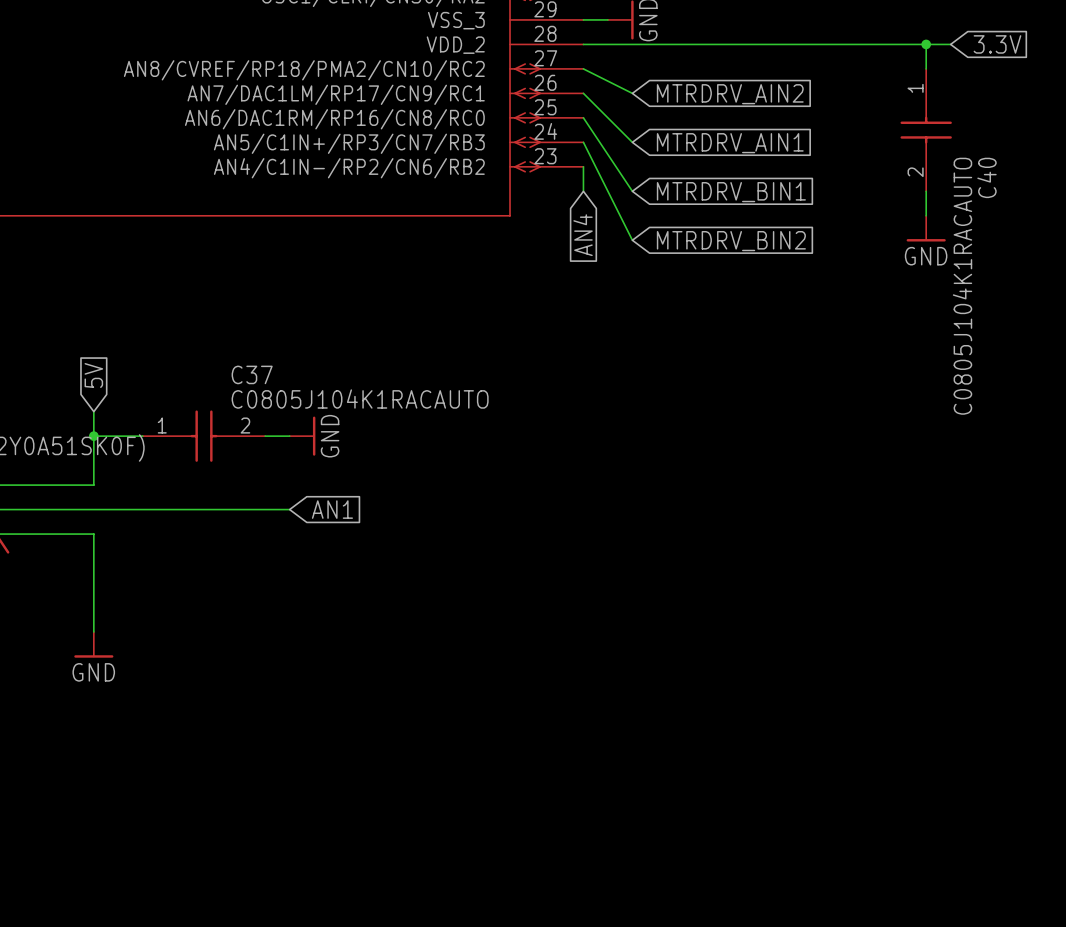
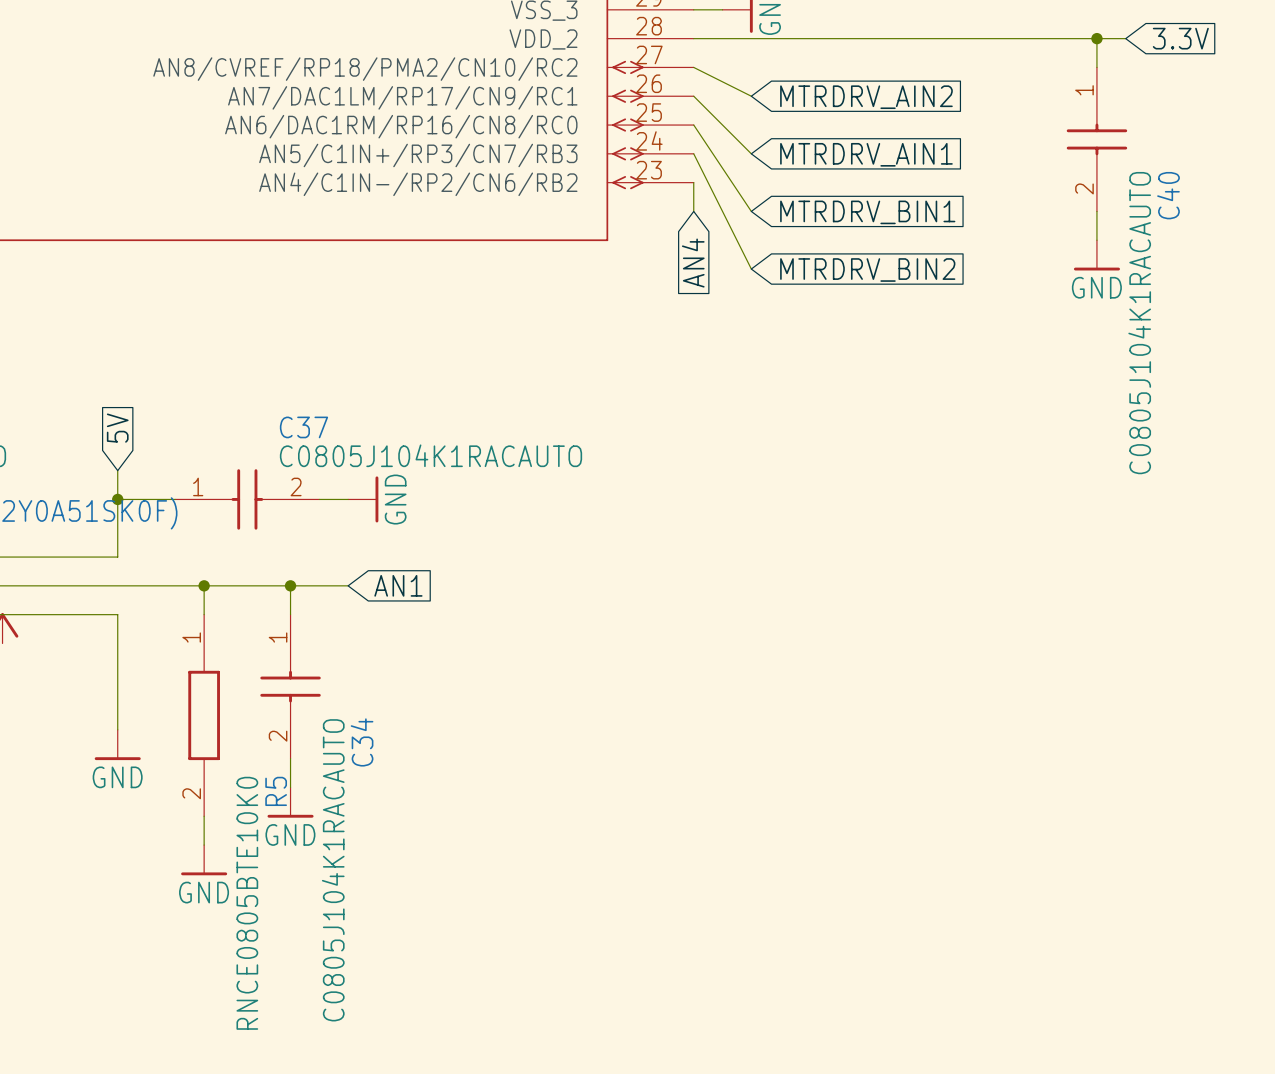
wire: none -> (204, 585) (204, 614)
junction: none -> (204, 585)
wire: none -> (290, 585) (290, 614)
junction: none -> (290, 585)
C34: none -> C0805J104K1RACAUTO (290, 686)
R5: none -> RNCE0805BTE10K0 (204, 715)
wire: none -> (290, 758) (290, 787)
power symbol: none -> GND (290, 802)
wire: none -> (204, 816) (204, 845)
power symbol: none -> GND (204, 860)

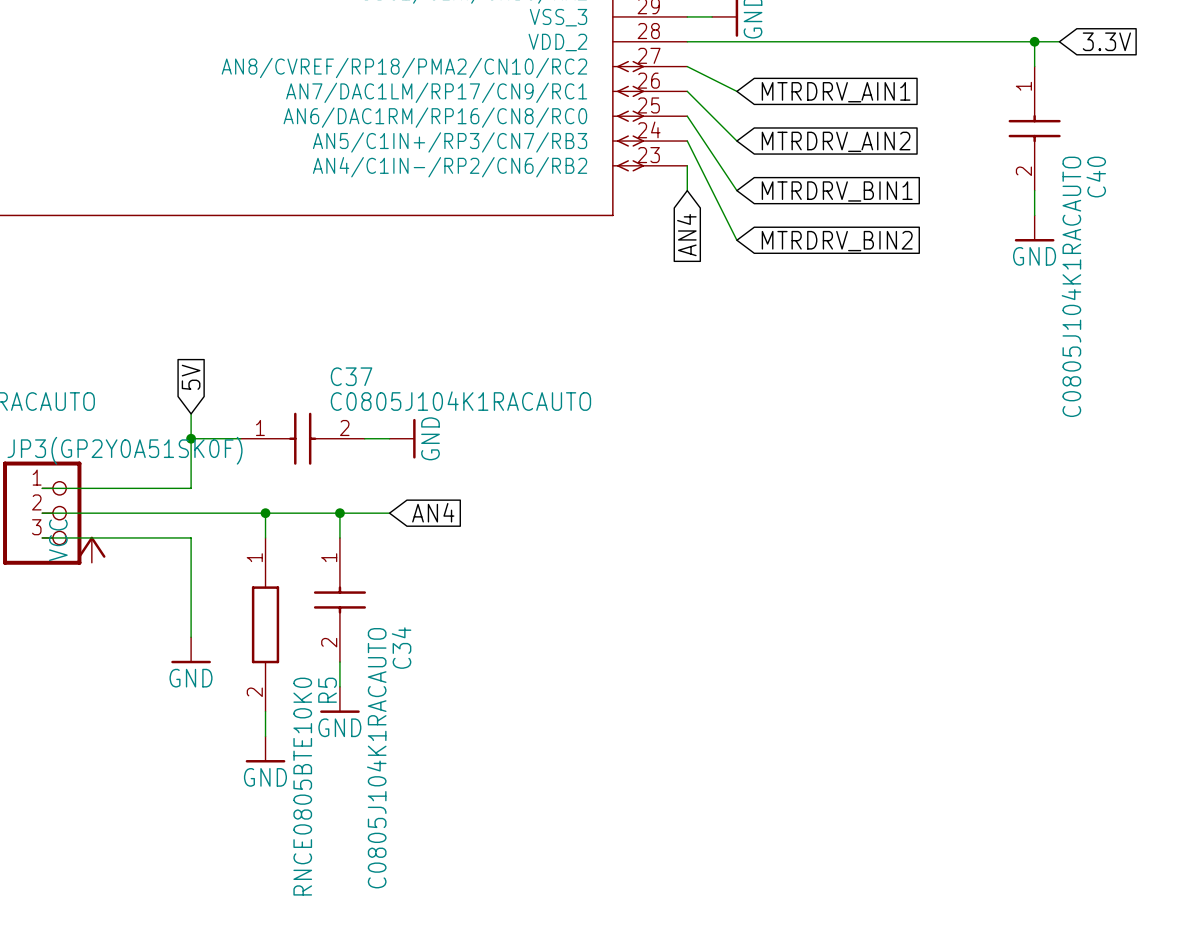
global label: MTRDRV_AIN2 (866, 97) -> MTRDRV_AIN1 (836, 92)
global label: MTRDRV_AIN1 (866, 154) -> MTRDRV_AIN2 (836, 141)
global label: AN1 (398, 585) -> AN4 (433, 512)

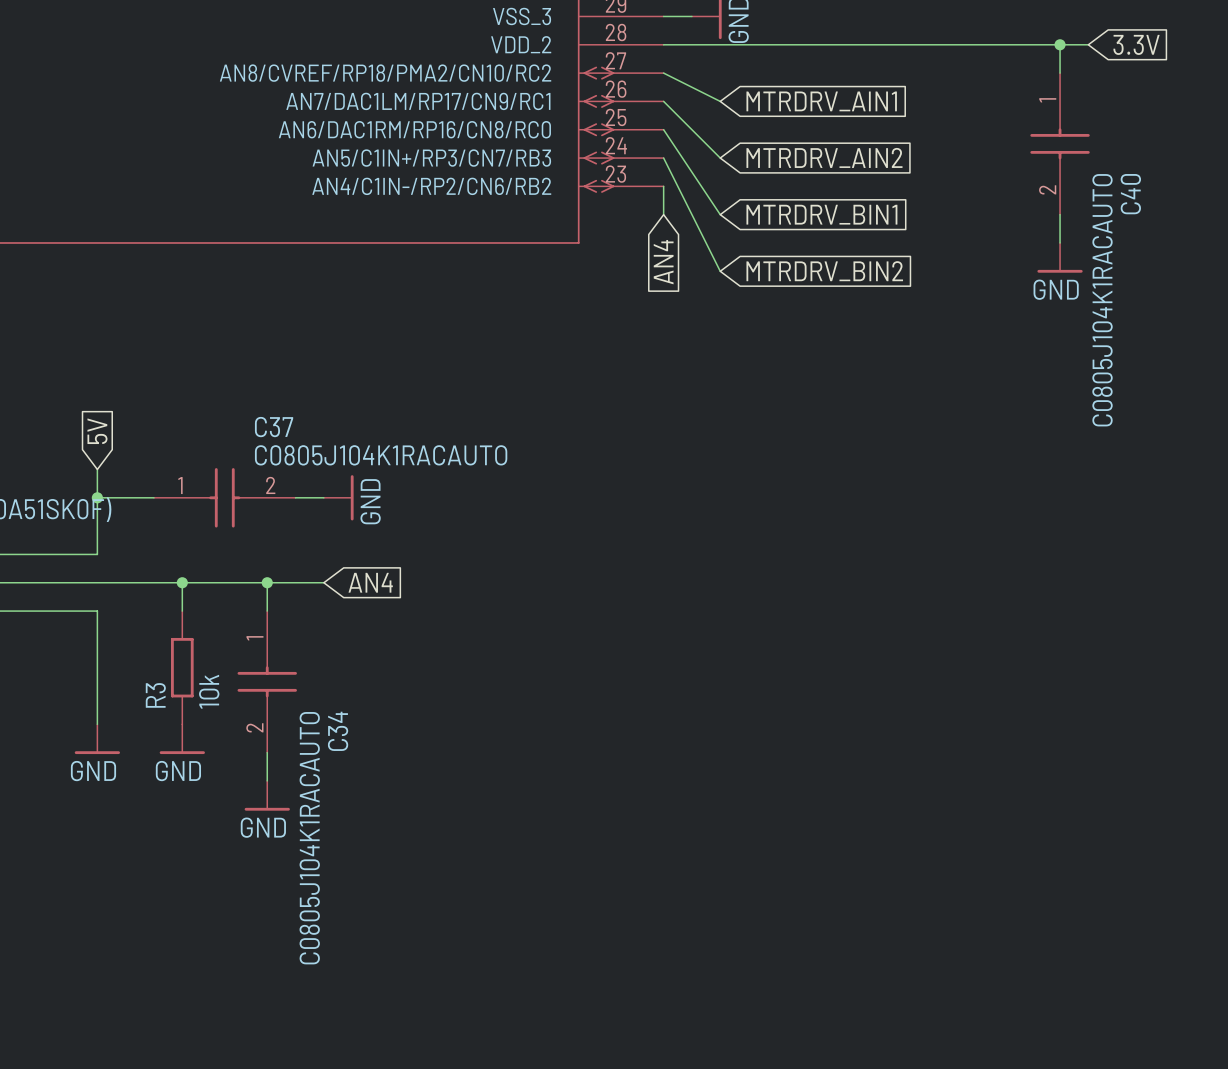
R3: none -> 10k (182, 667)
R5: RNCE0805BTE10K0 (265, 624) -> none
wire: (265, 711) (265, 736) -> none
power symbol position: GND (265, 749) -> GND (182, 739)

